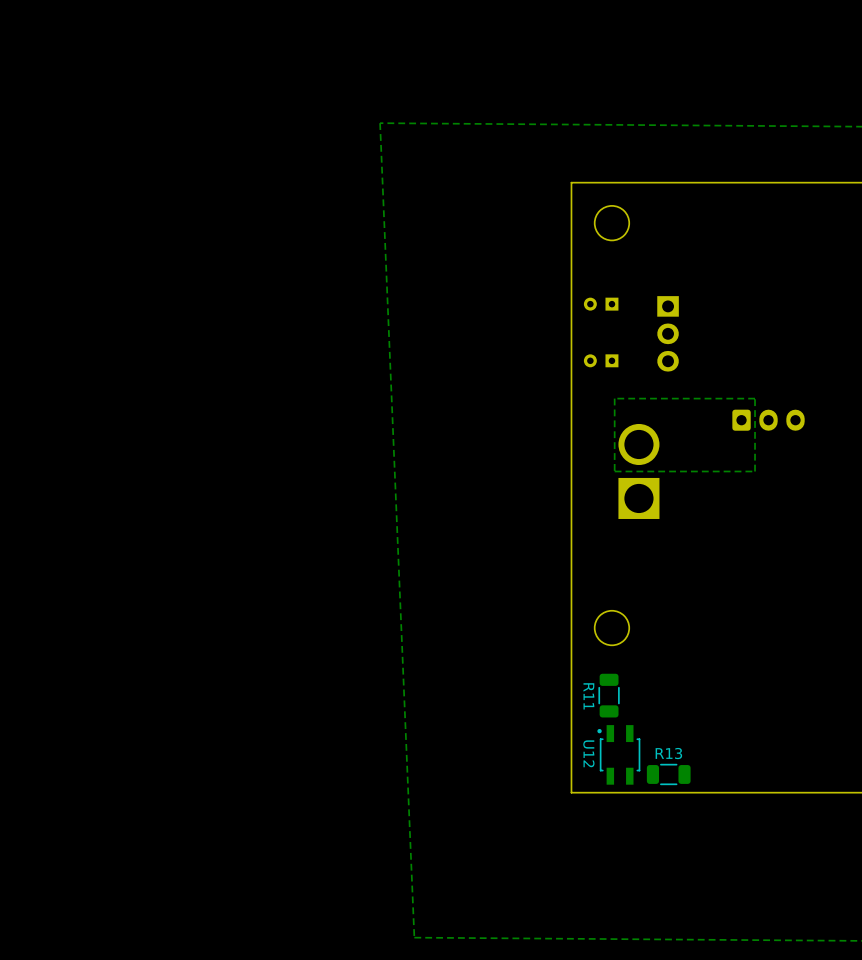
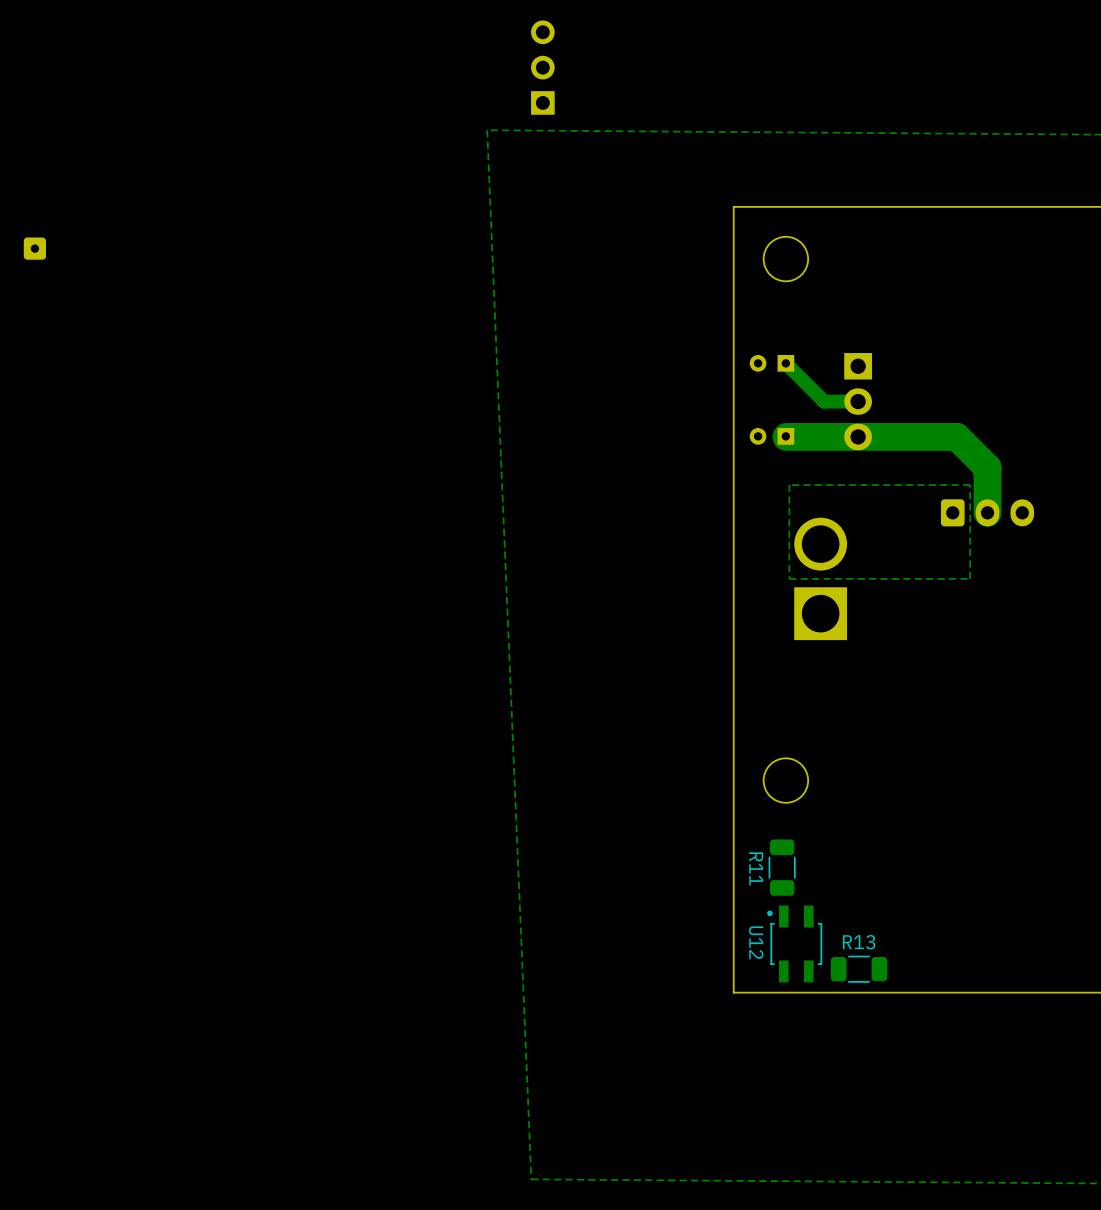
part: none -> (542, 67)
part: none -> (34, 248)
track: none -> (785, 363) (824, 401) (858, 401)
track: none -> (785, 436) (956, 436) (987, 467) (987, 512)

